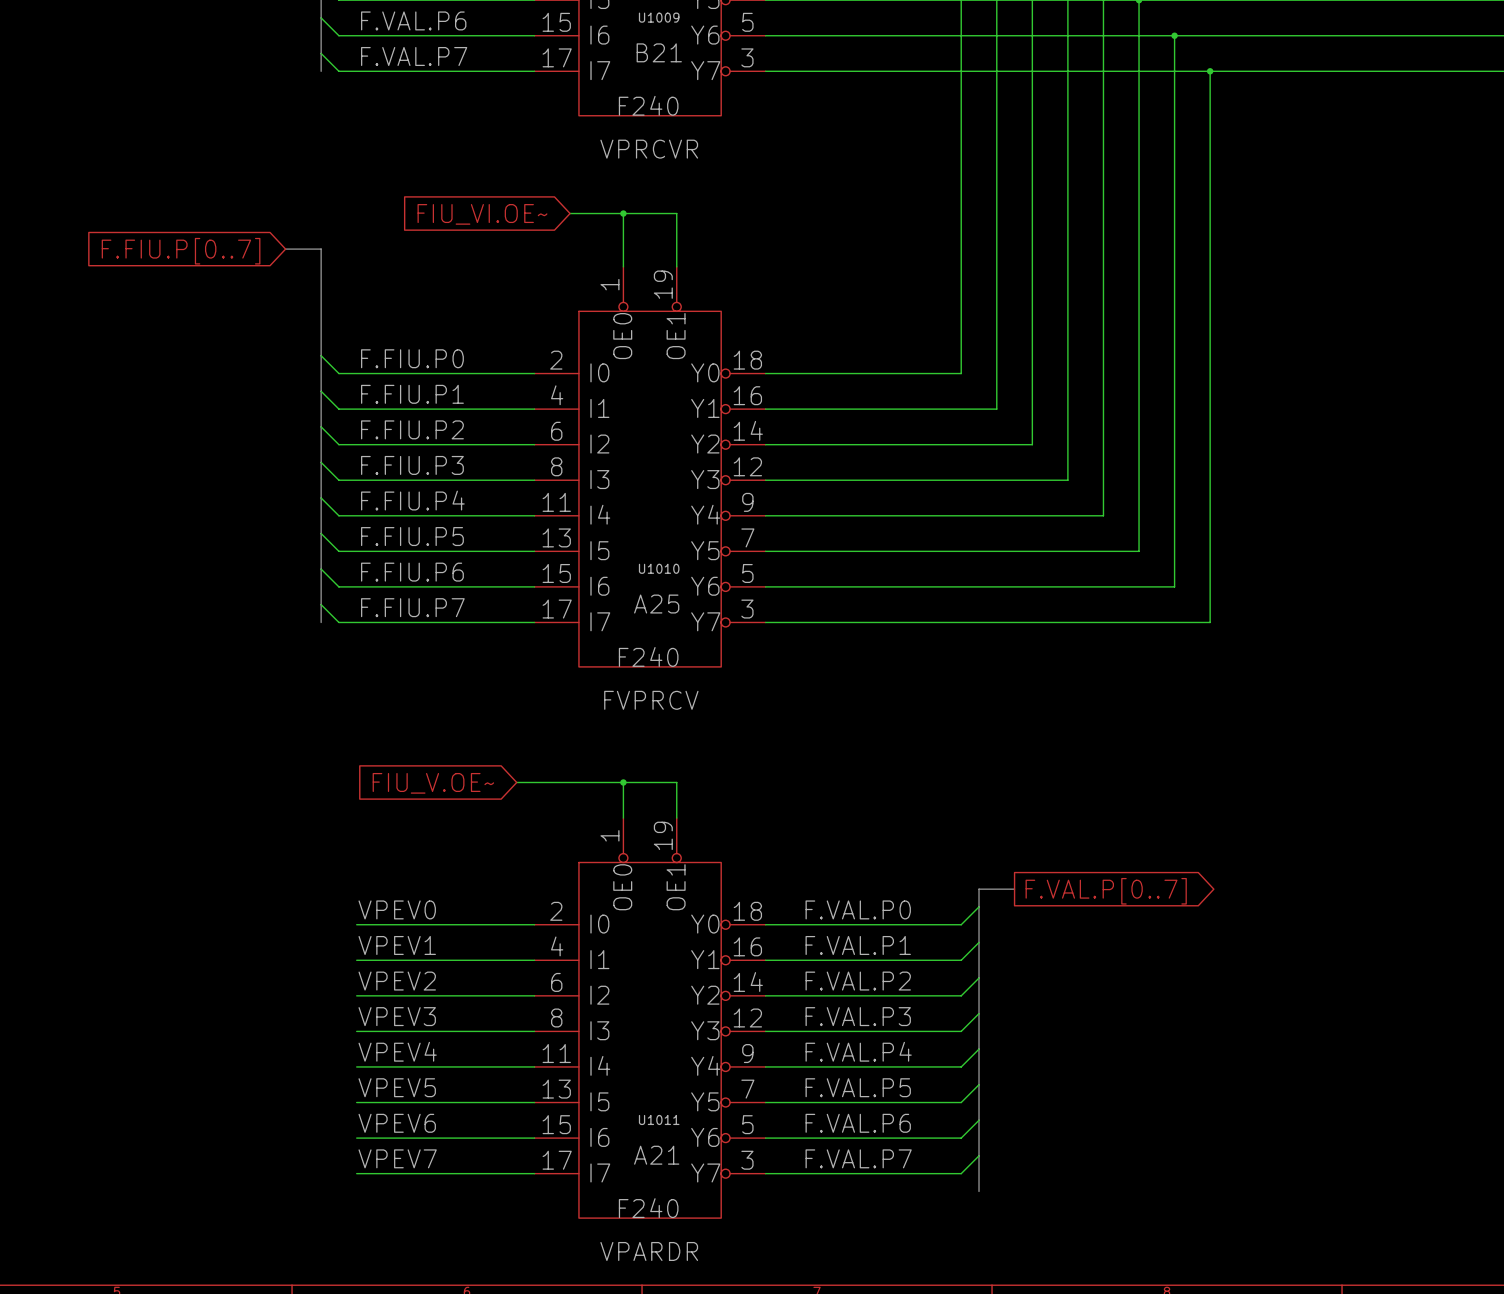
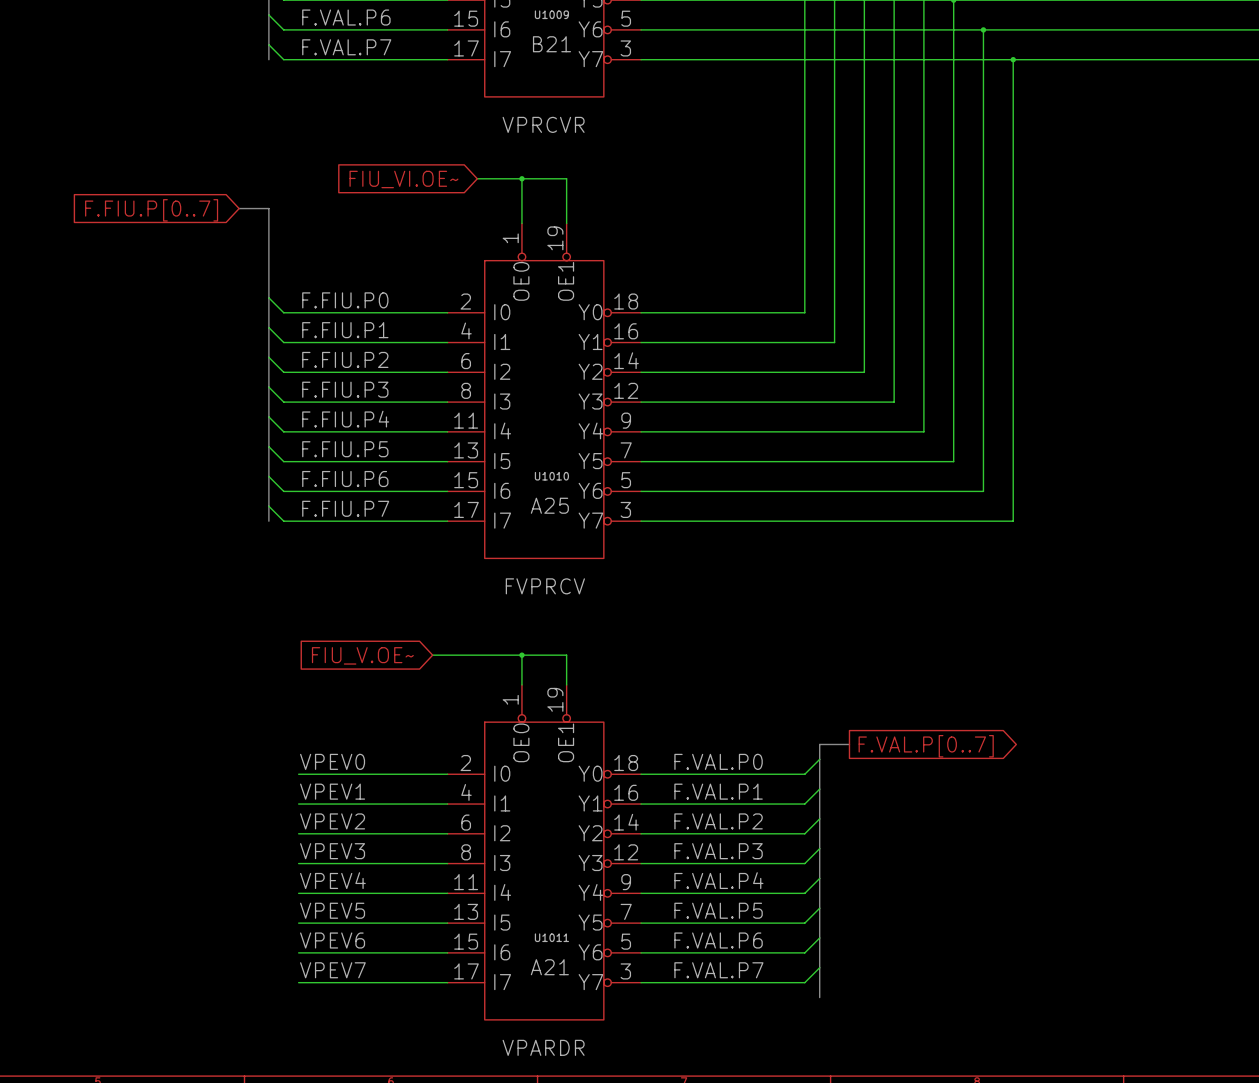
U1009 value: F240 (648, 105) -> none
U1010 value: F240 (648, 656) -> none
U1011 value: F240 (648, 1208) -> none

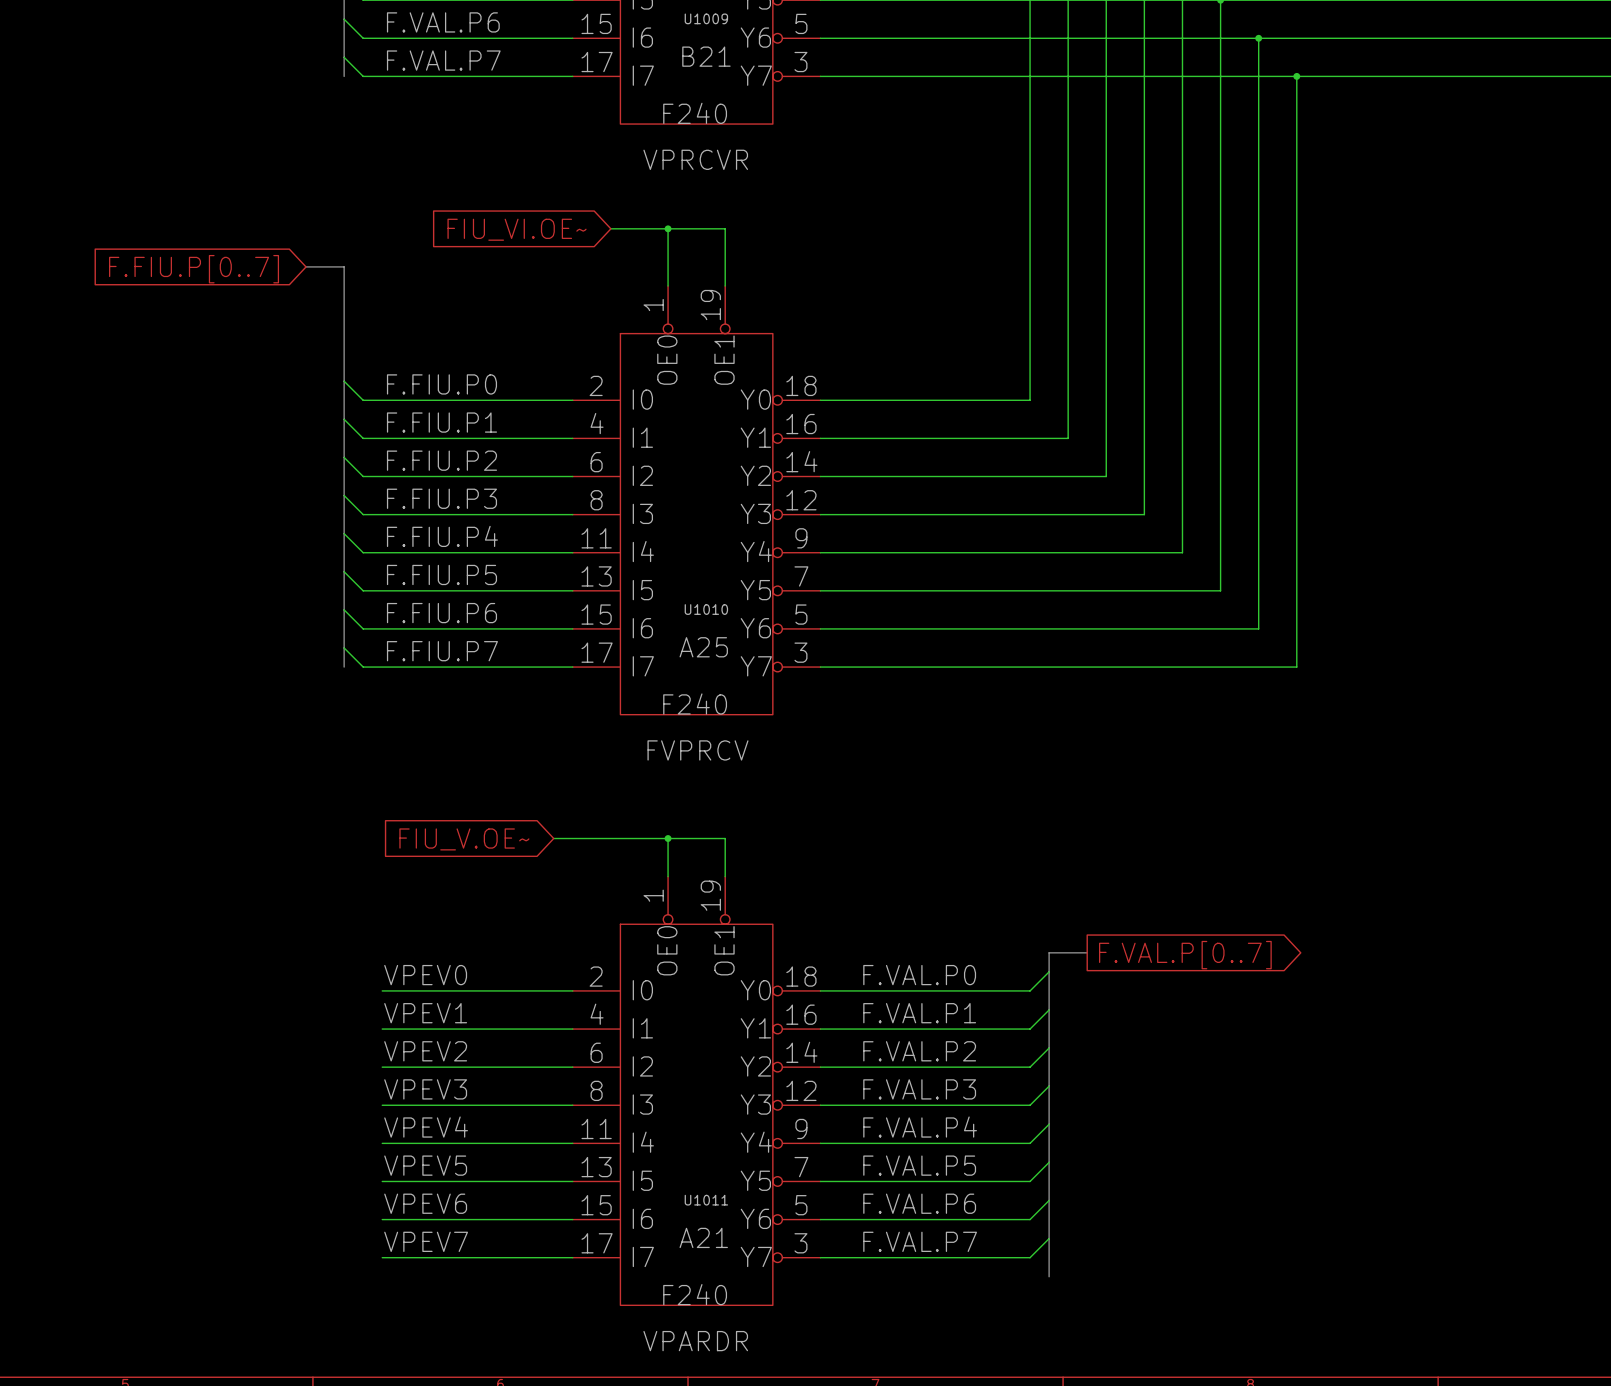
U1009 value: none -> F240 (695, 113)
U1010 value: none -> F240 (695, 703)
U1011 value: none -> F240 (695, 1294)

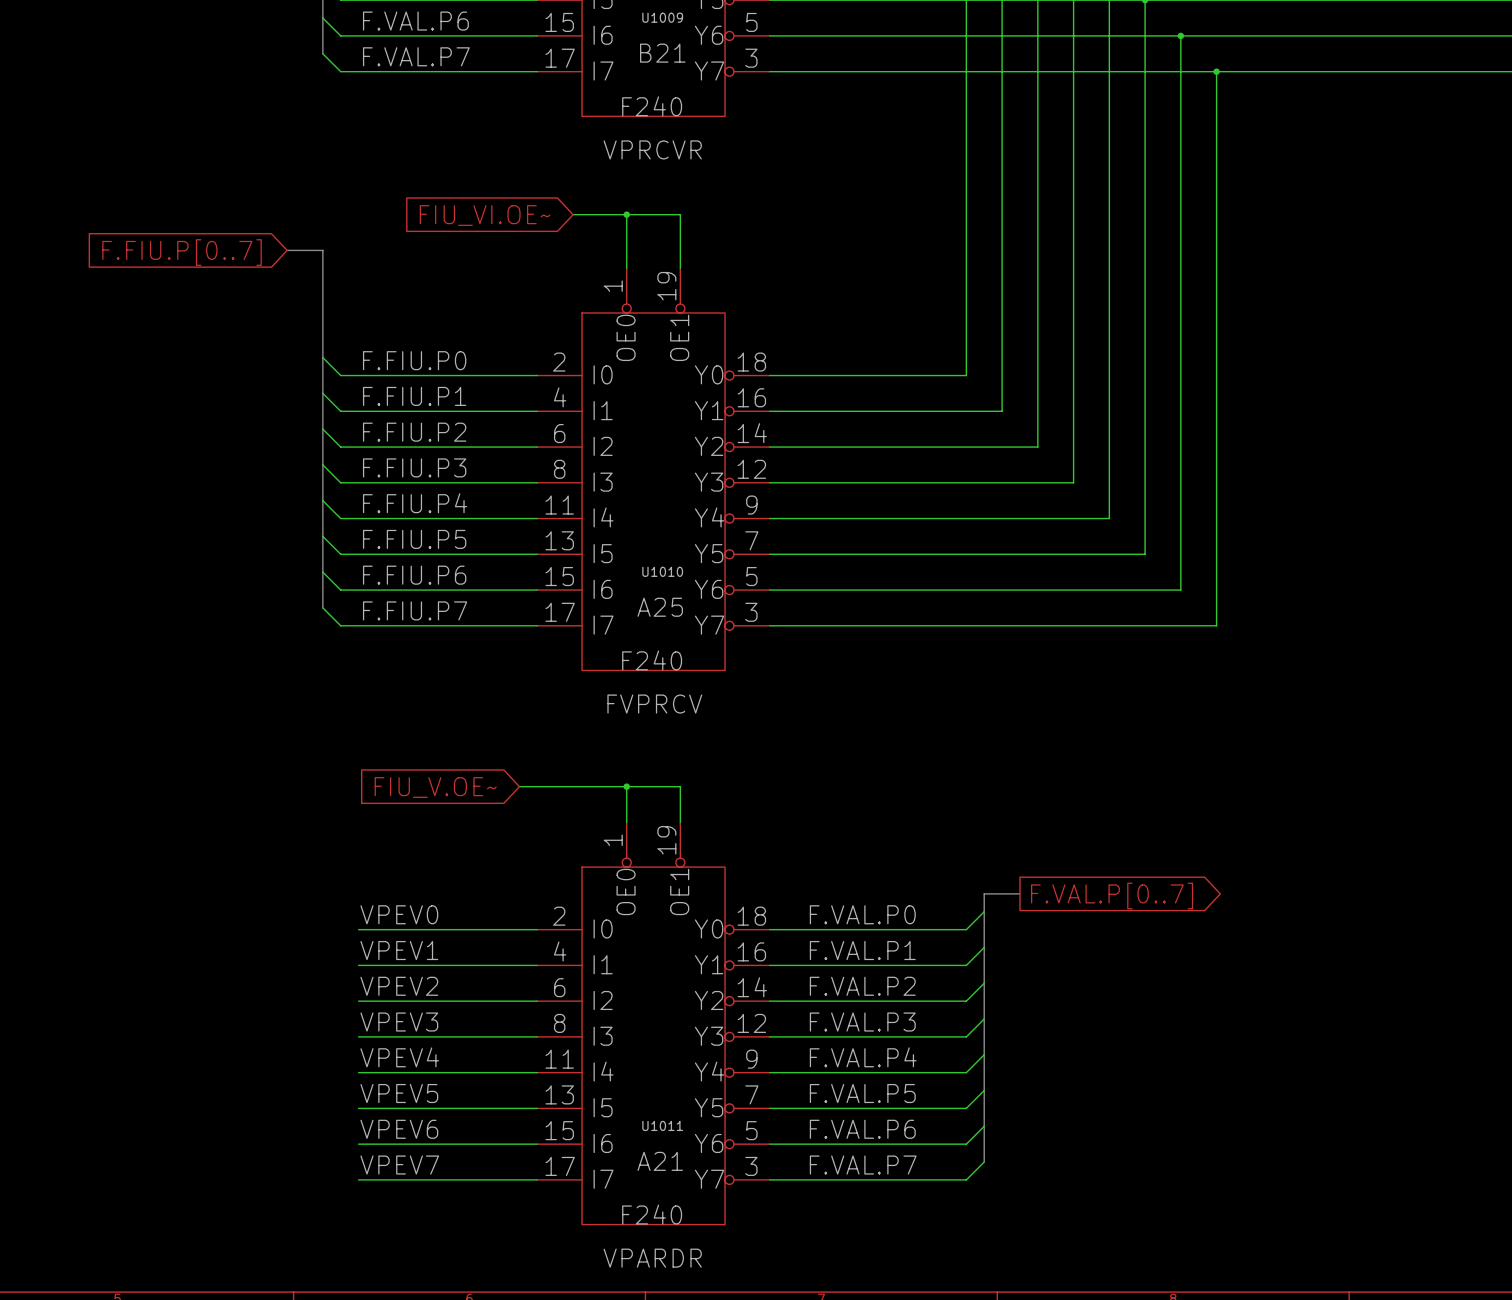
bus: (344, 57) (344, 76) -> none
bus: (344, 647) (344, 667) -> none
bus: (1049, 1238) (1049, 1276) -> none

